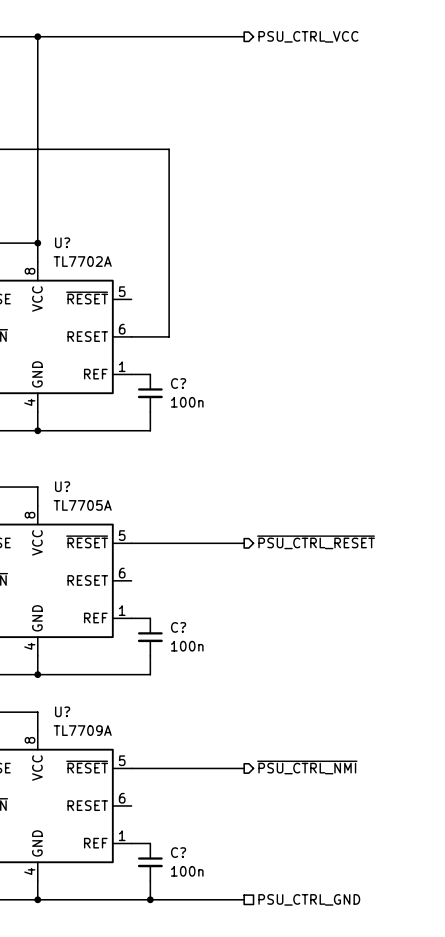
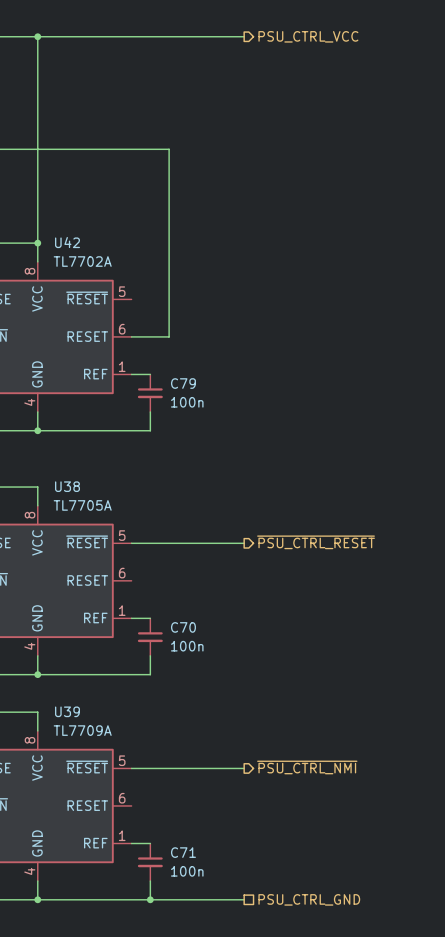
U? name: U? (62, 242) -> U42 (67, 242)
C? name: C? (178, 383) -> C79 (183, 383)
U? name: U? (62, 486) -> U38 (67, 486)
C? name: C? (178, 627) -> C70 (183, 627)
U? name: U? (62, 711) -> U39 (67, 711)
C? name: C? (178, 852) -> C71 (183, 852)

